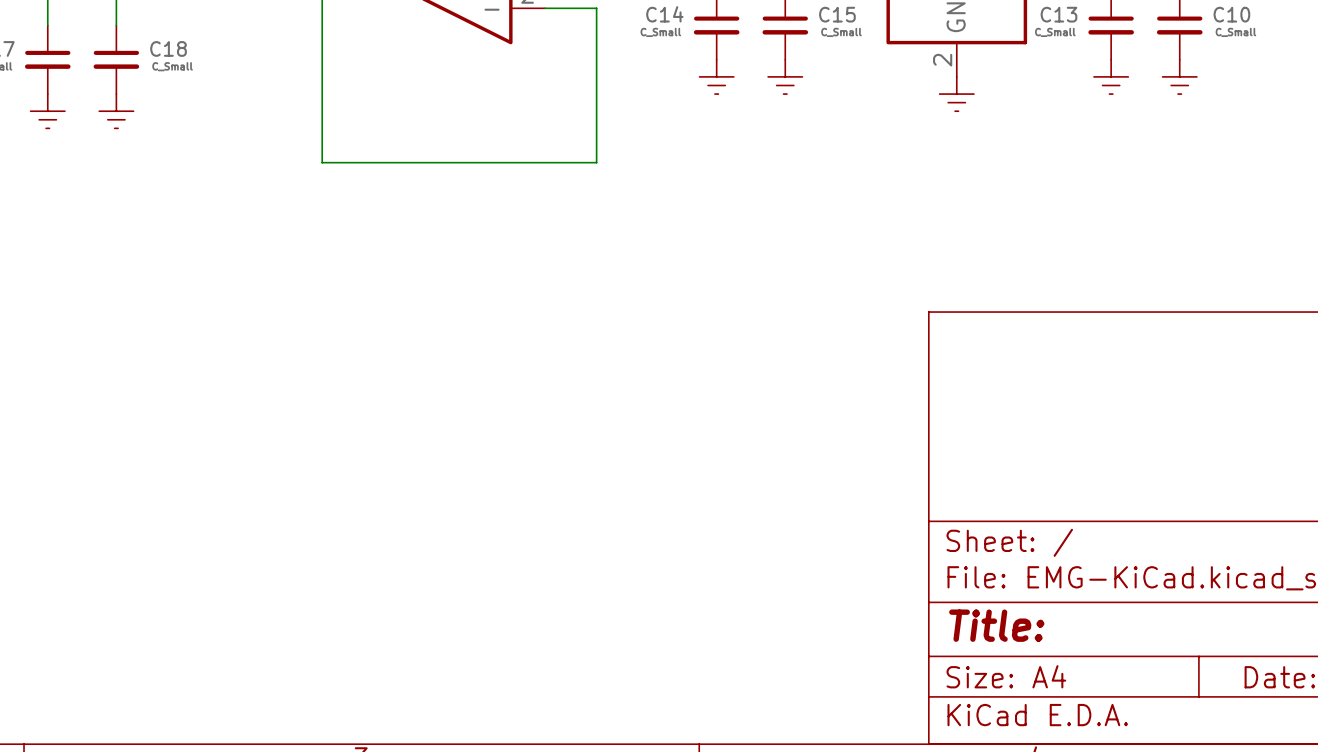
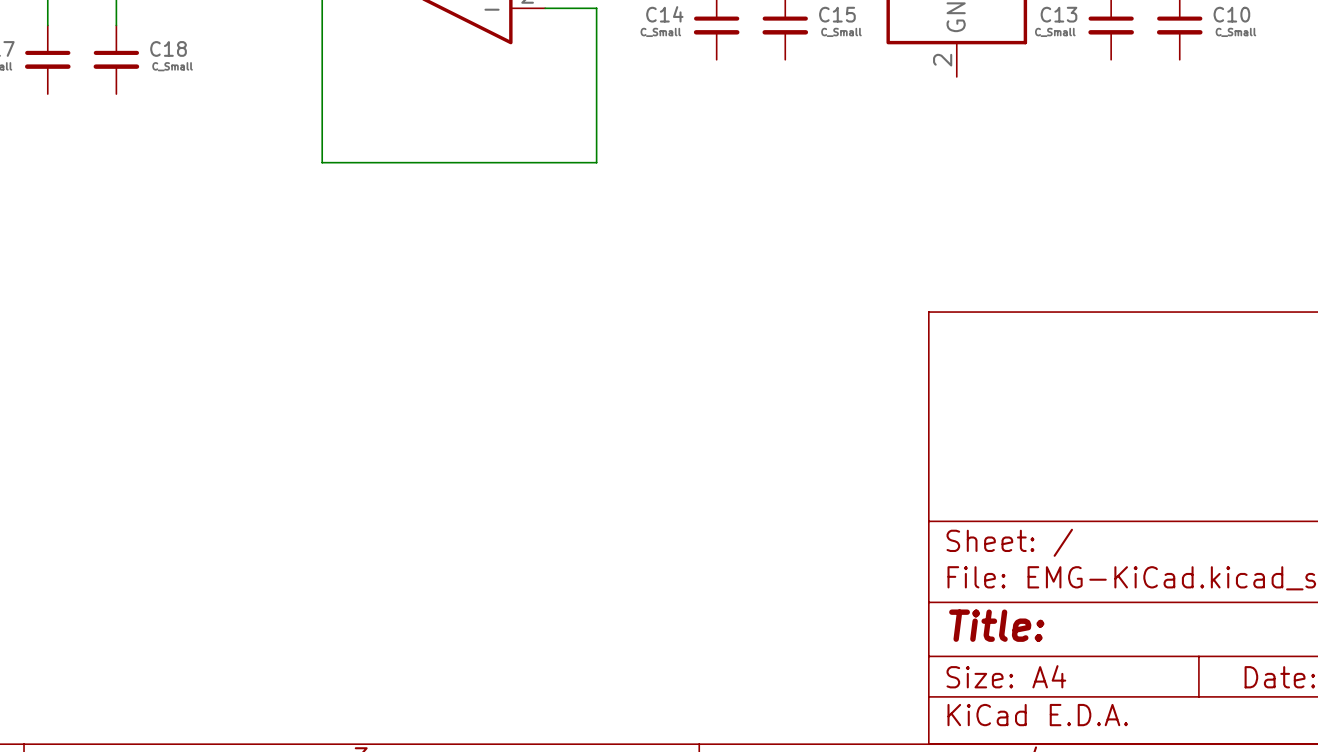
power symbol: (716, 76) -> none
power symbol: (785, 76) -> none
power symbol: (1111, 76) -> none
power symbol: (1179, 76) -> none
power symbol: (956, 94) -> none
power symbol: (47, 111) -> none
power symbol: (116, 111) -> none

